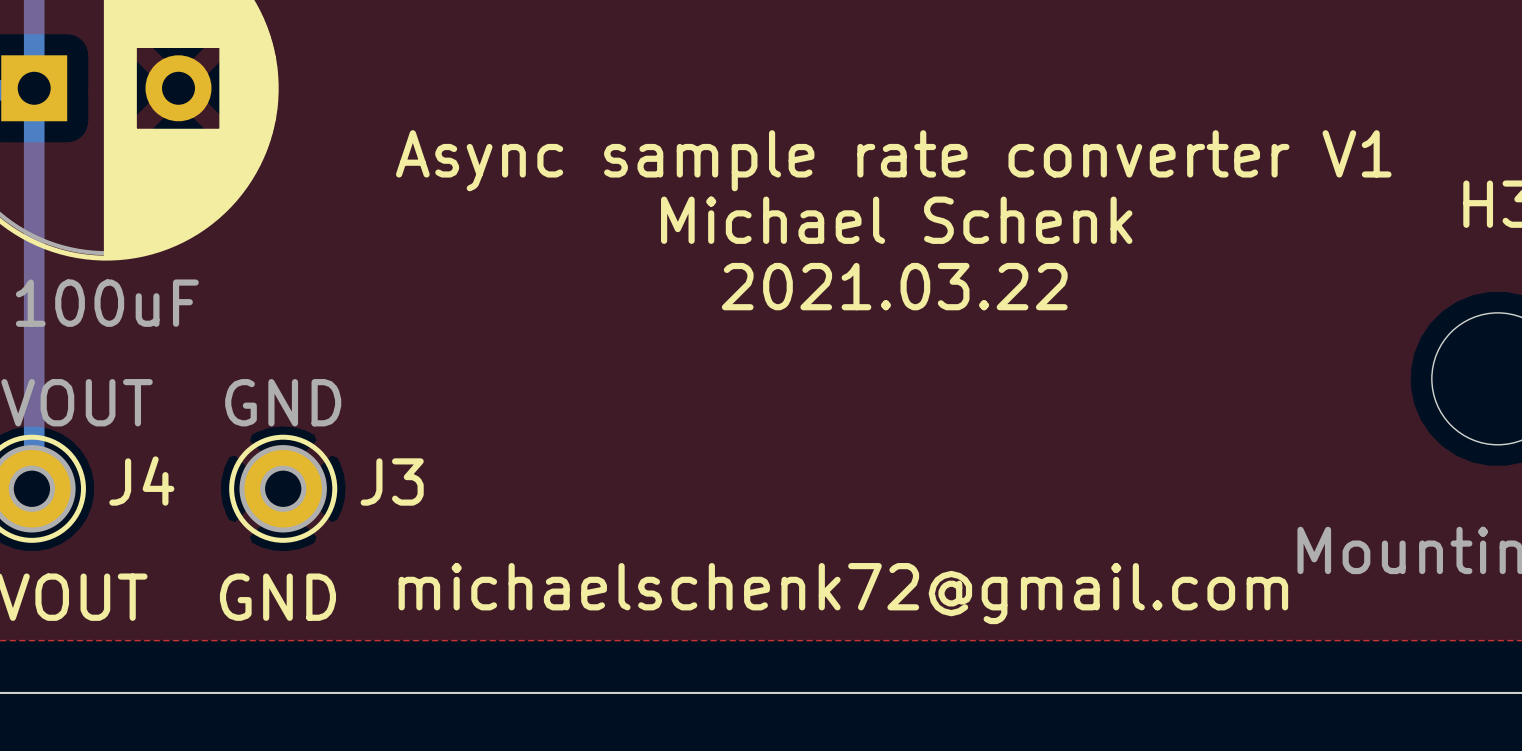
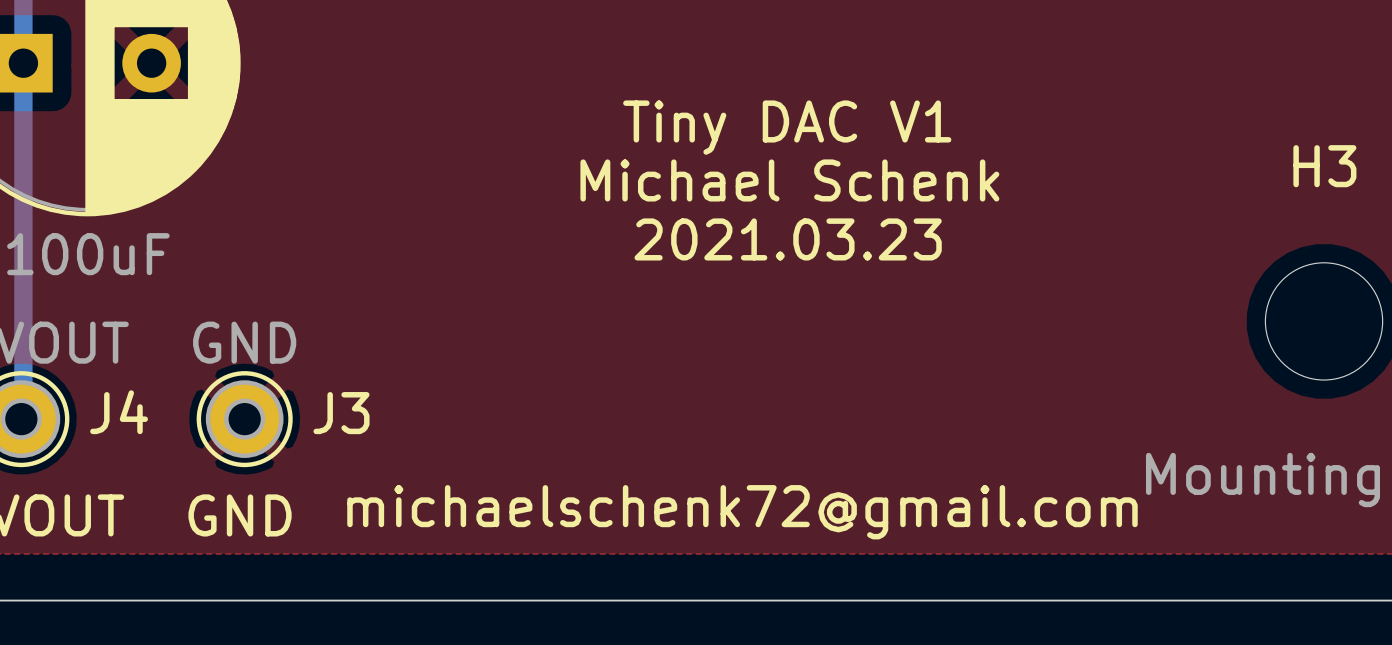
text: Async sample rate converter V1 (893, 160) -> Tiny DAC V1 (787, 127)
text: 2021.03.22 (894, 286) -> 2021.03.23 (788, 239)

